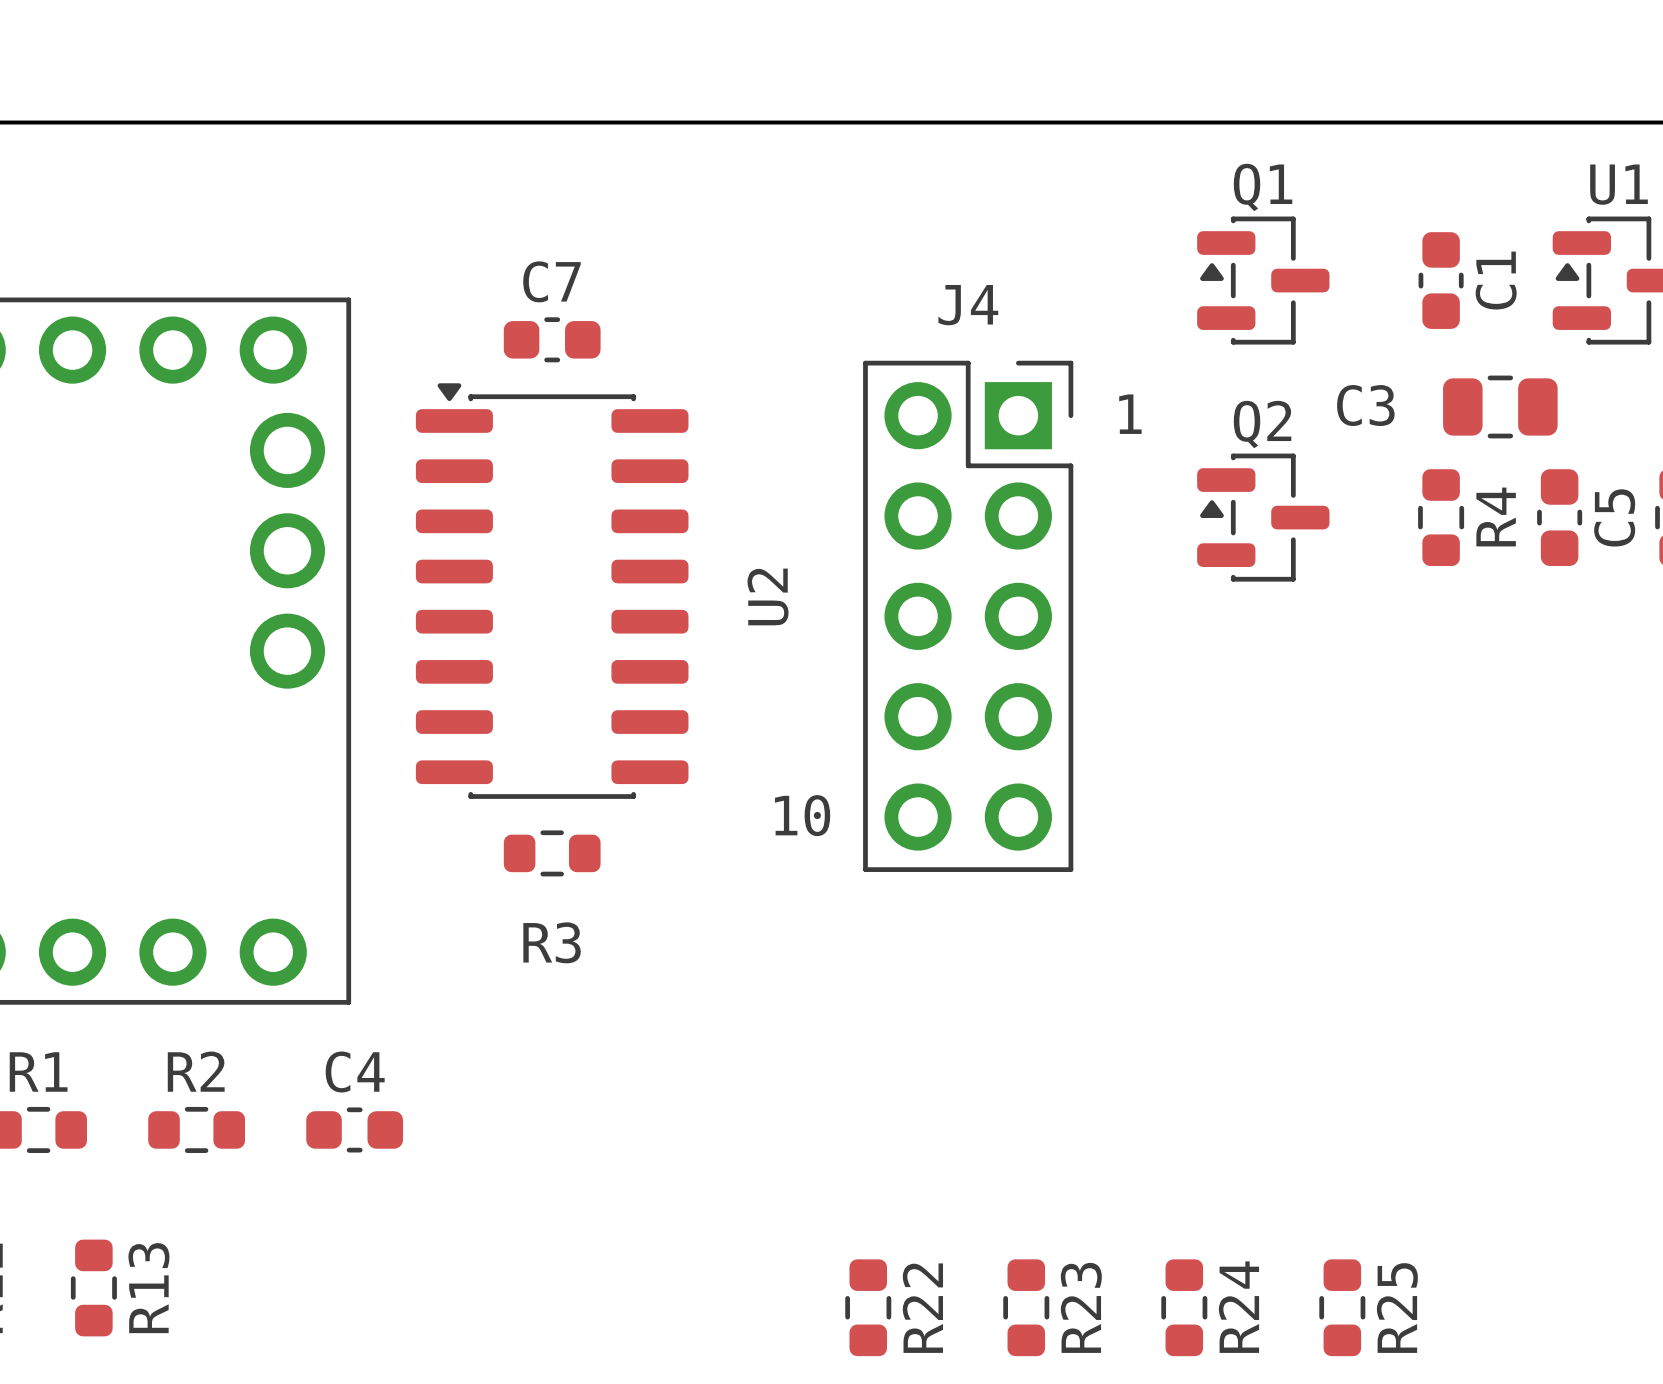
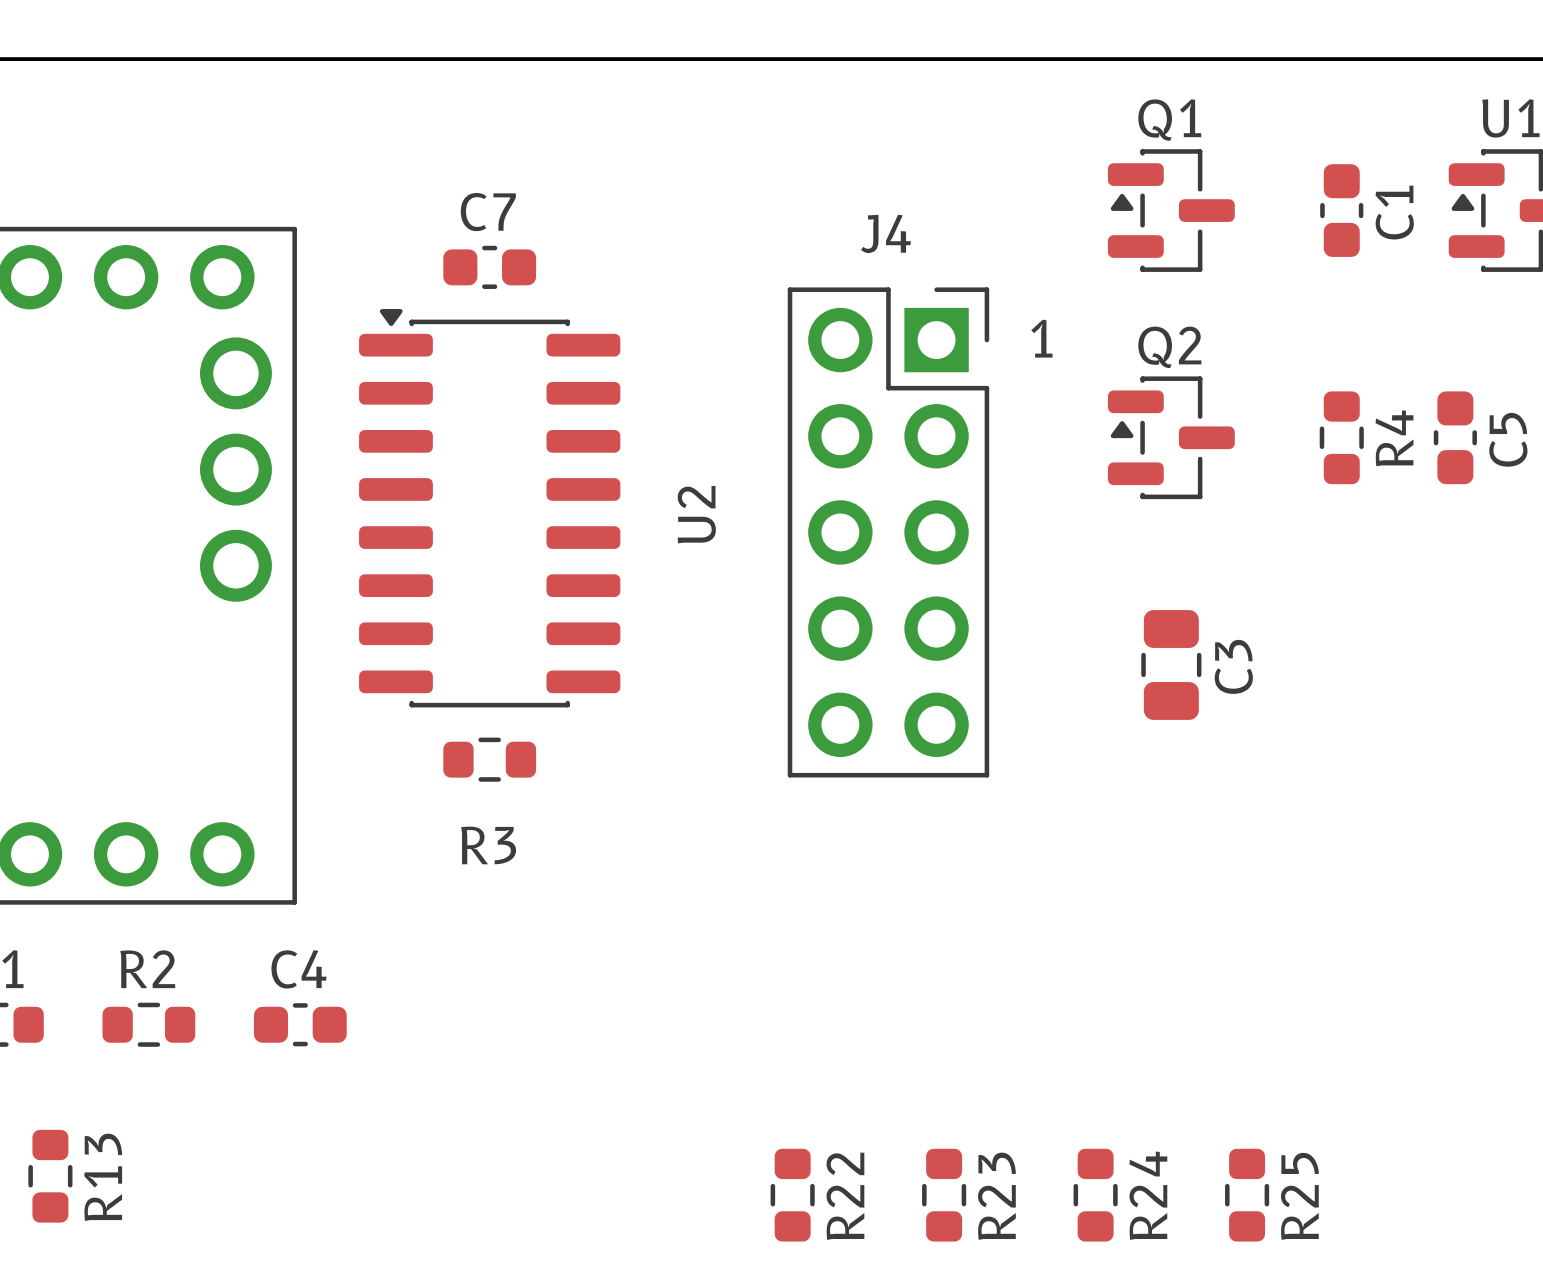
C3 name position: C3 (1365, 405) -> C3 (1233, 666)
C3 rotation: 0° (1500, 406) -> 90° clockwise (1171, 664)
C3 position: (1500, 406) -> (1171, 664)
text: 10 (802, 815) -> none

